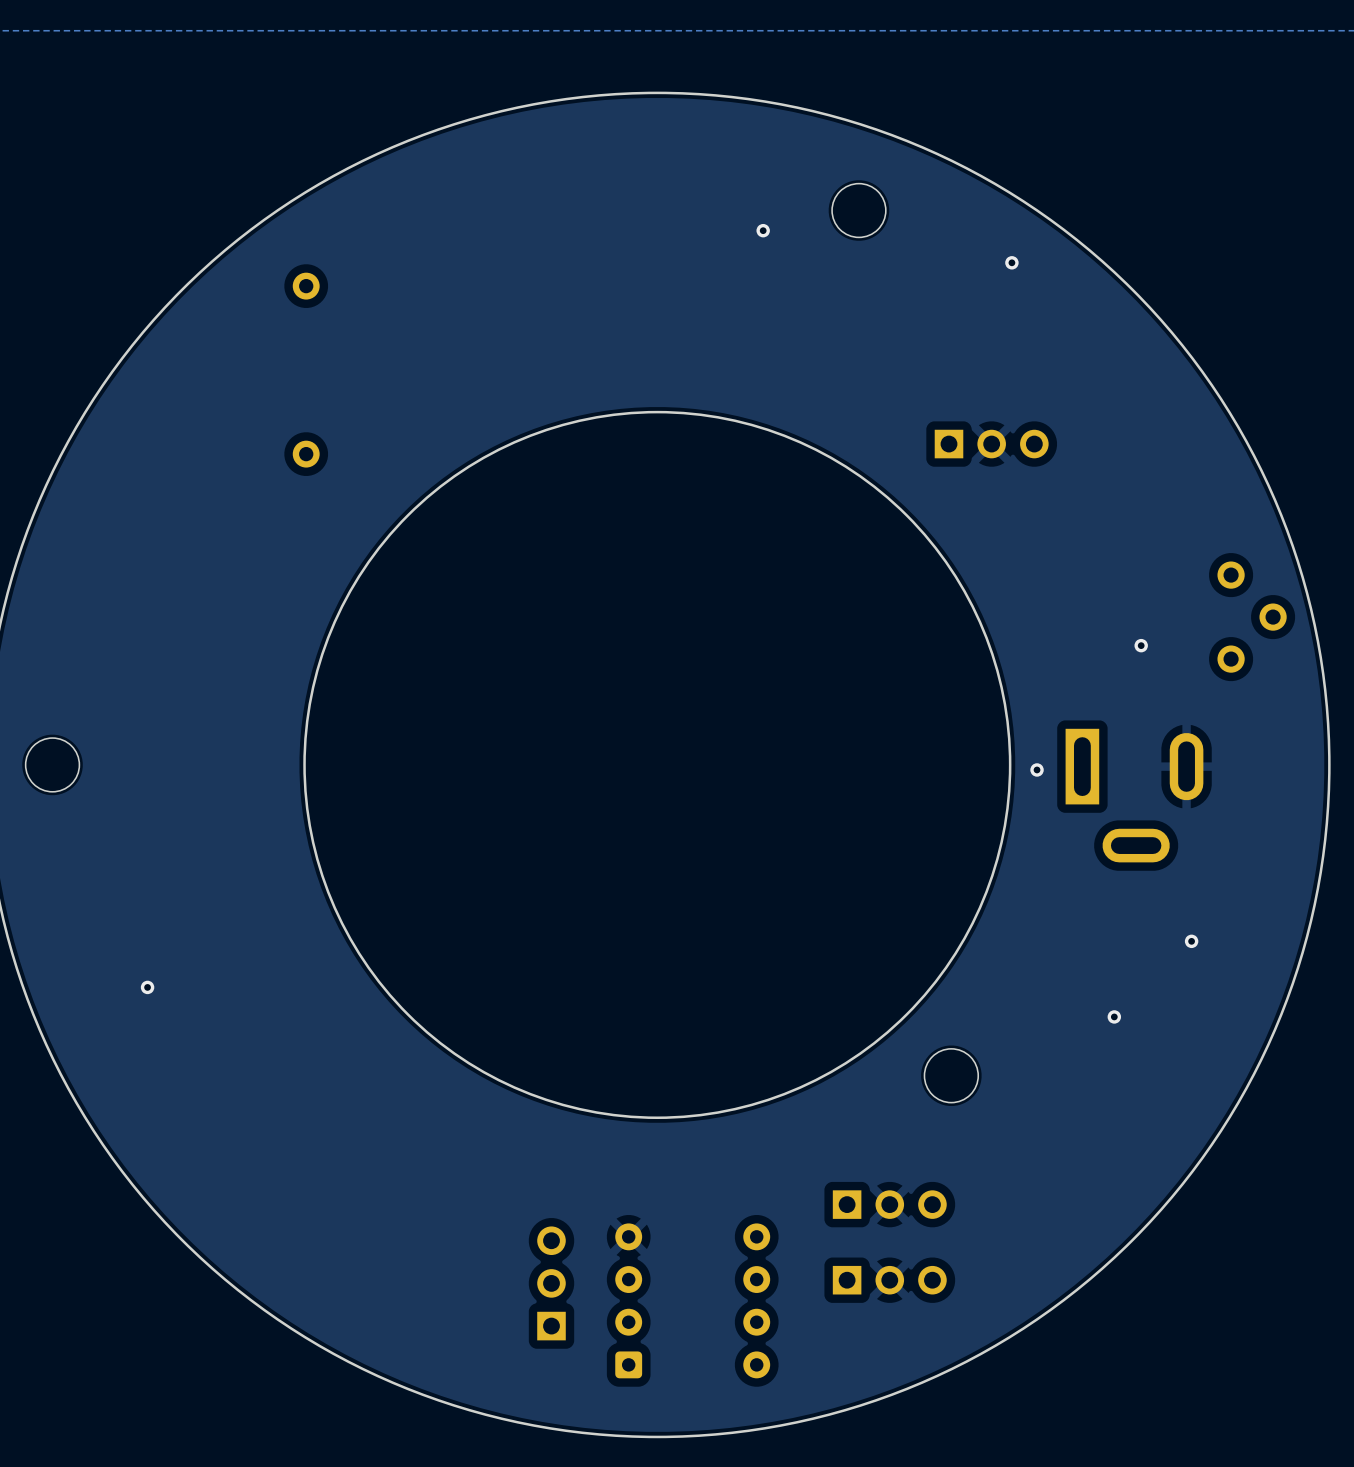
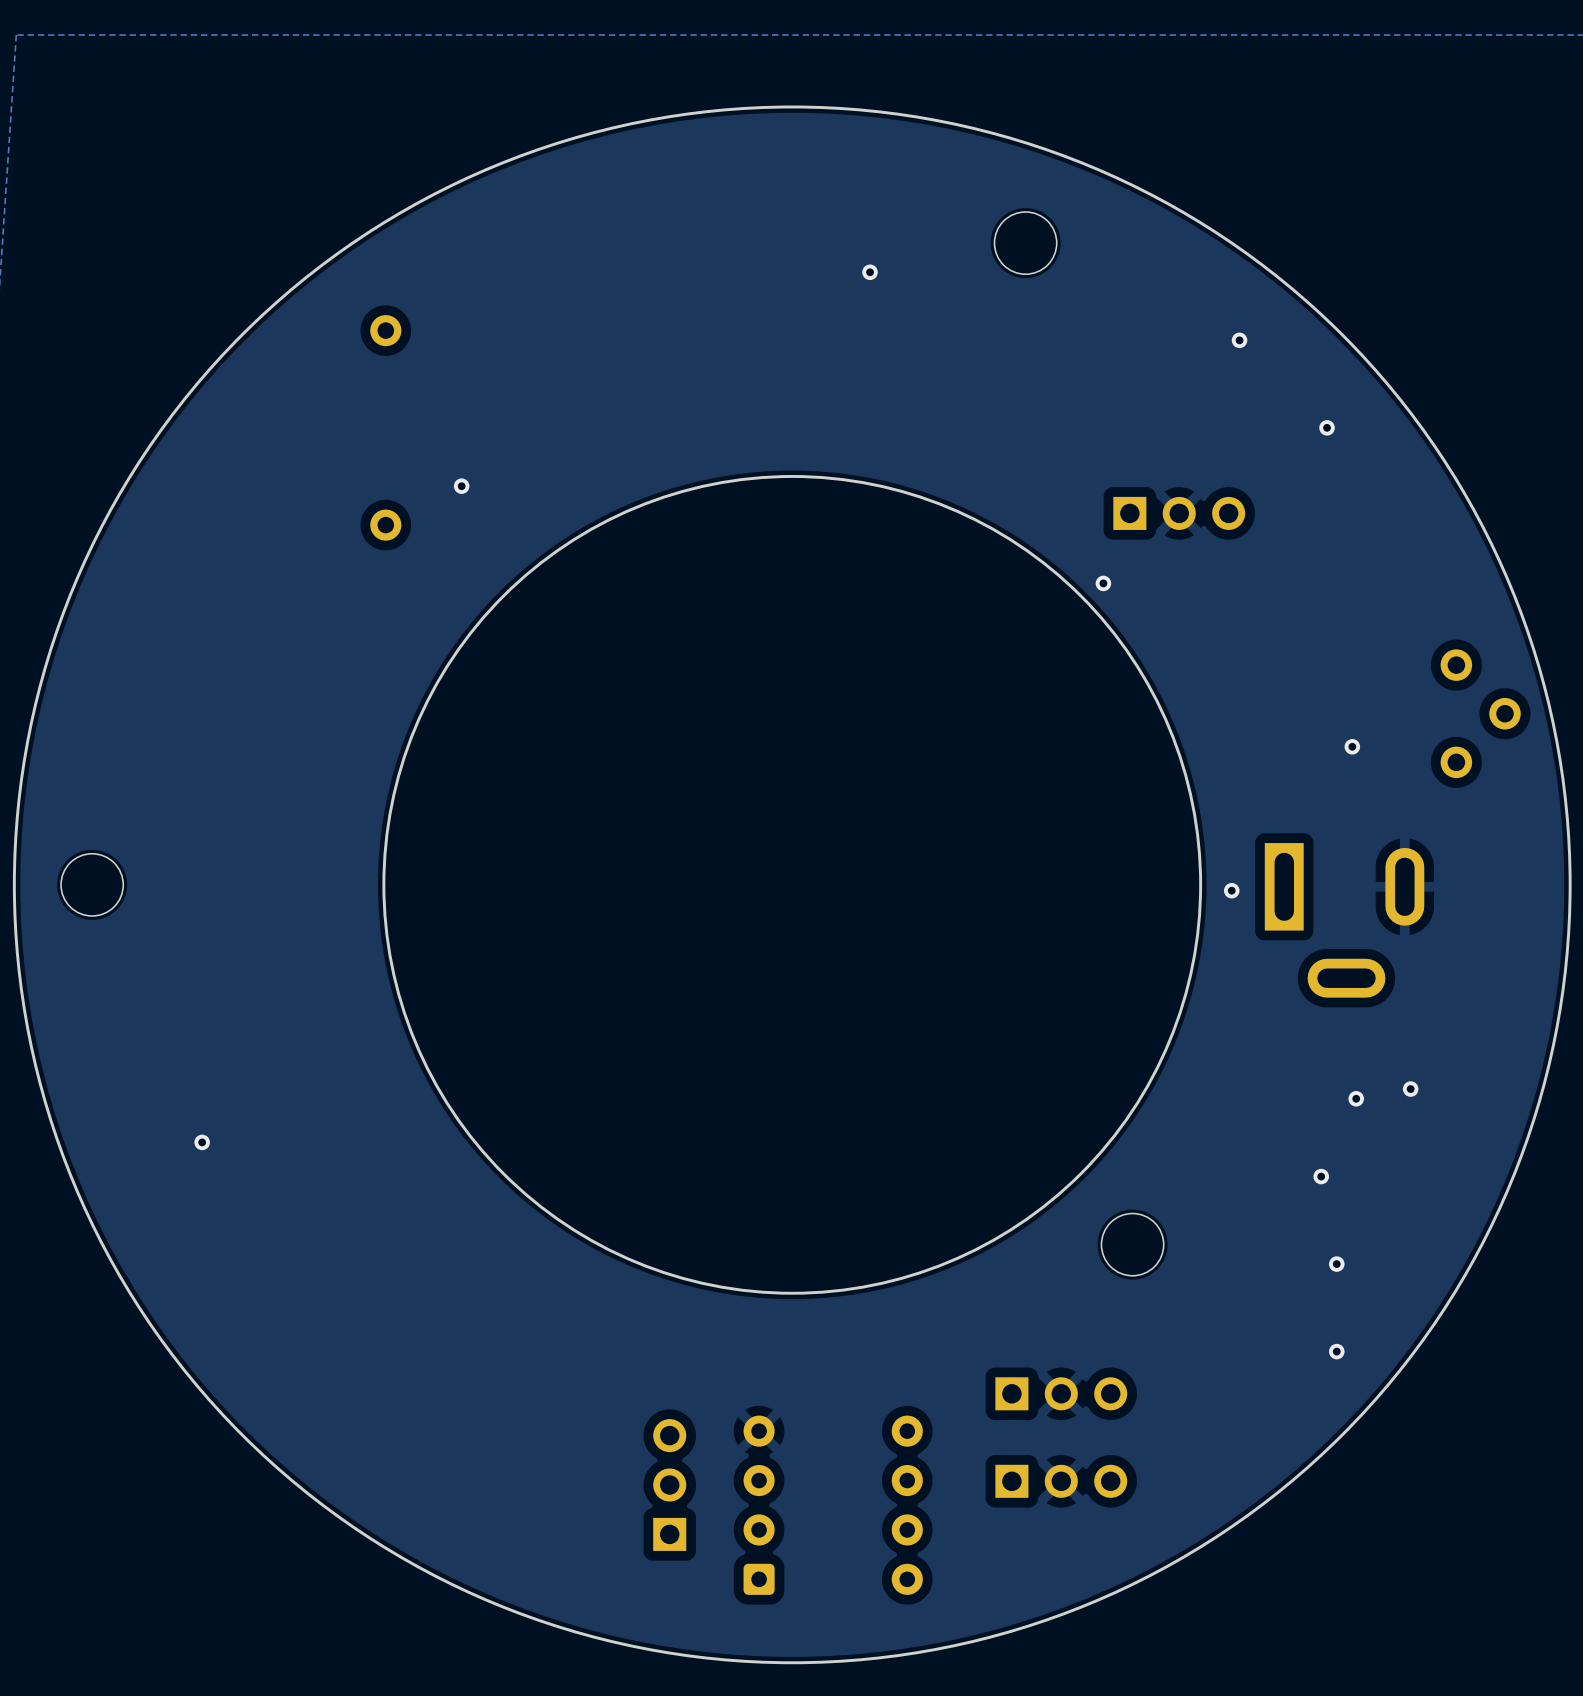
via position: (763, 230) -> (870, 272)
via position: (1011, 262) -> (1239, 340)
via: none -> (1327, 427)
via: none -> (461, 486)
via: none -> (1103, 583)
via: none -> (1356, 1098)
via: none -> (1336, 1264)
via: none -> (1336, 1351)

